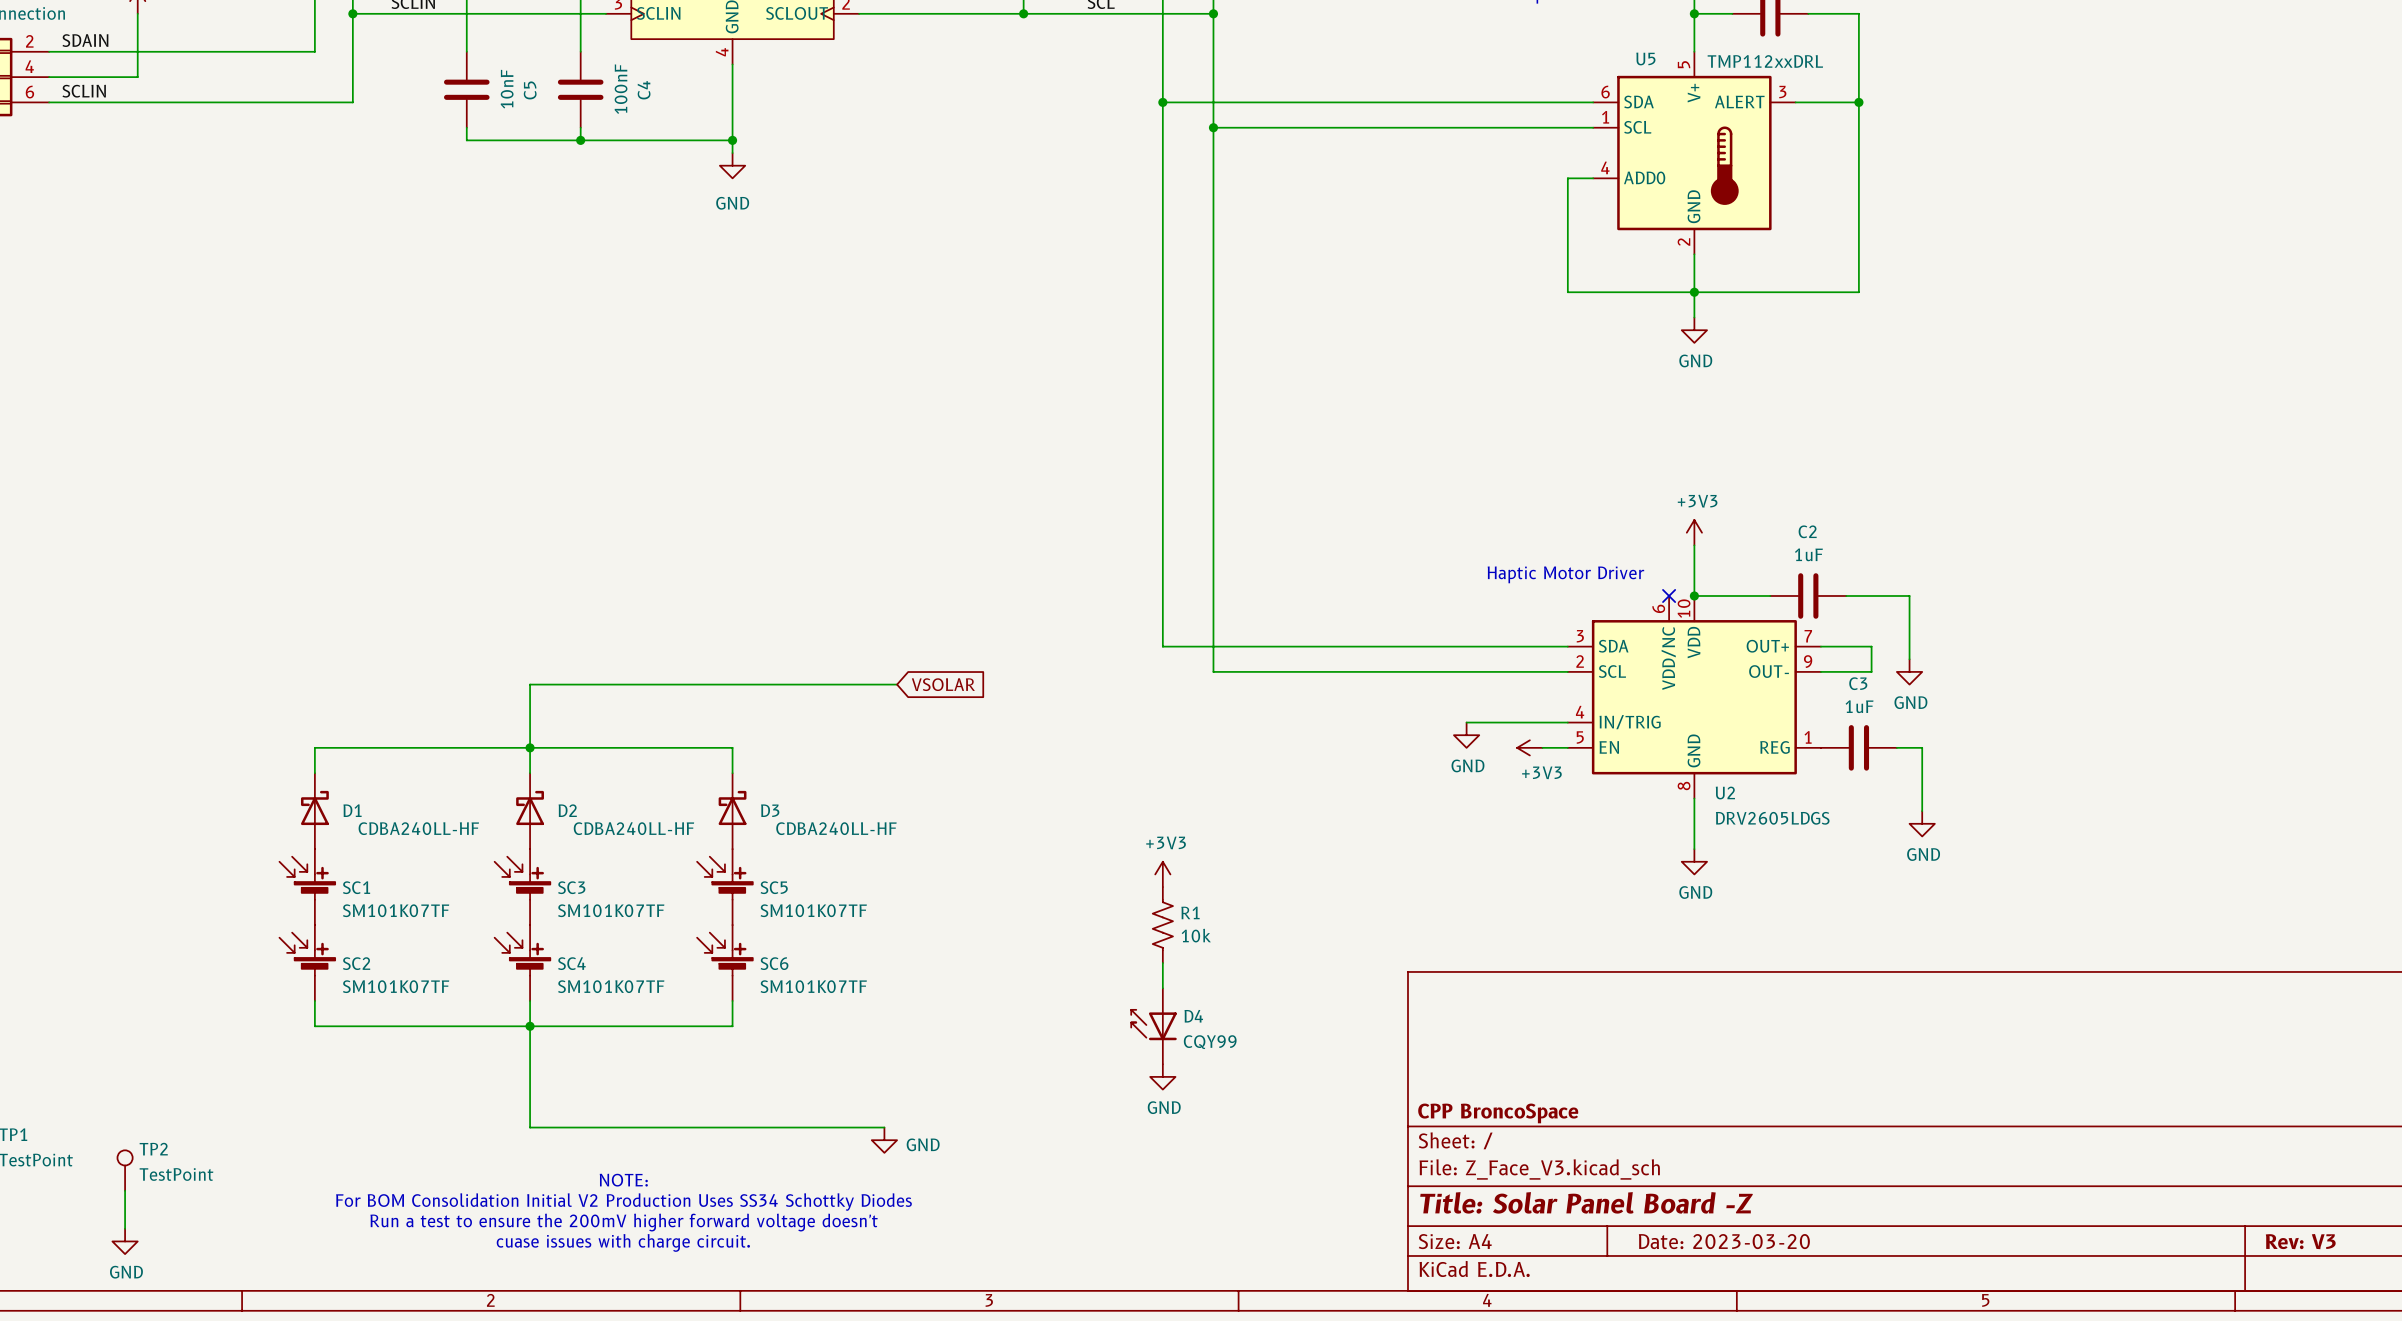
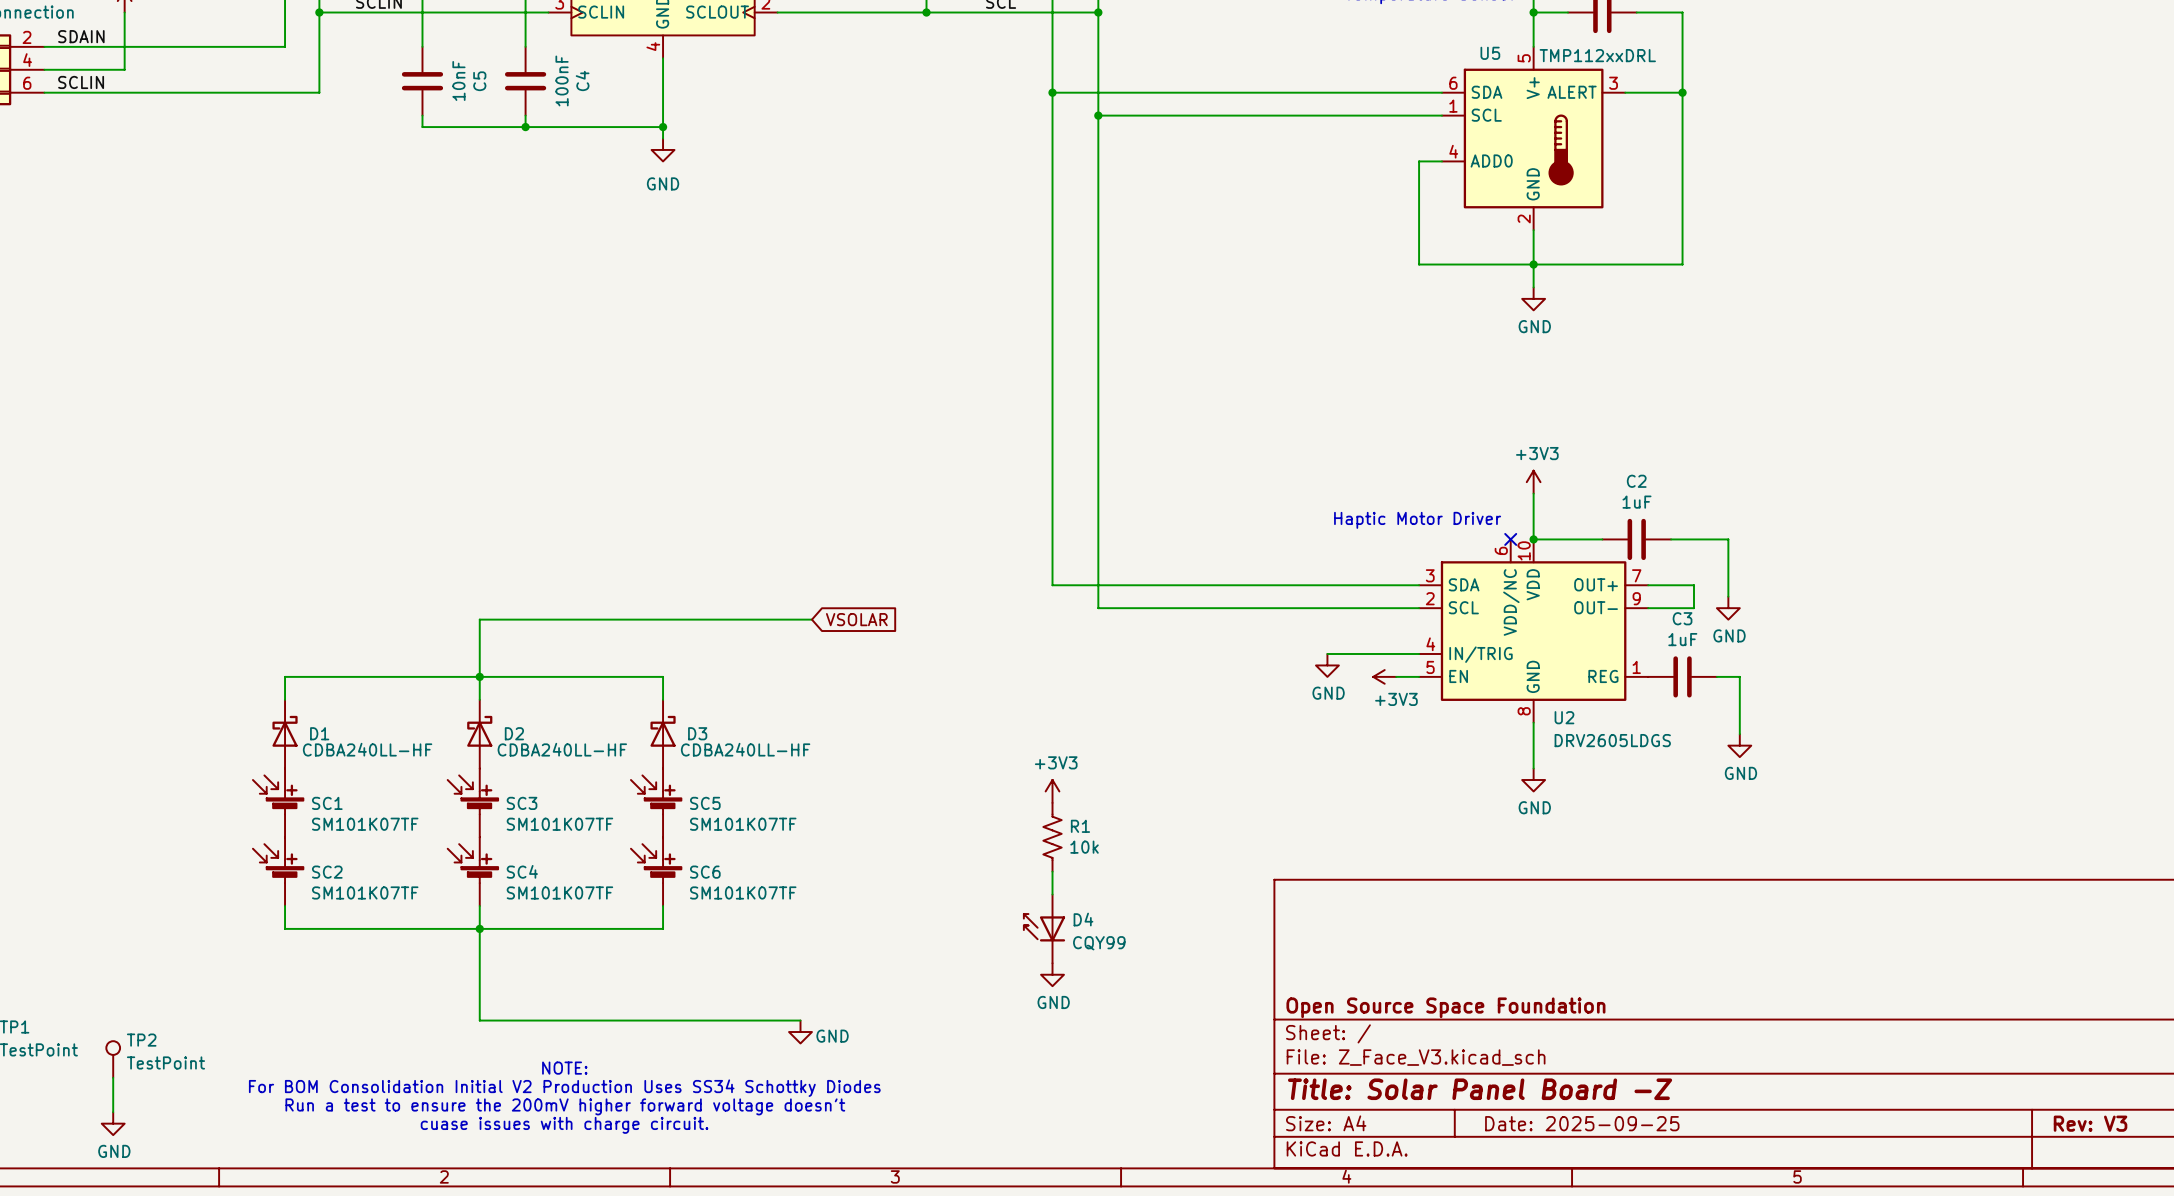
title block: CPP BroncoSpace (1498, 1113) -> Open Source Space Foundation (1445, 1007)
title block: Date: 2023-03-20 (1724, 1241) -> Date: 2025-09-25 (1582, 1123)

